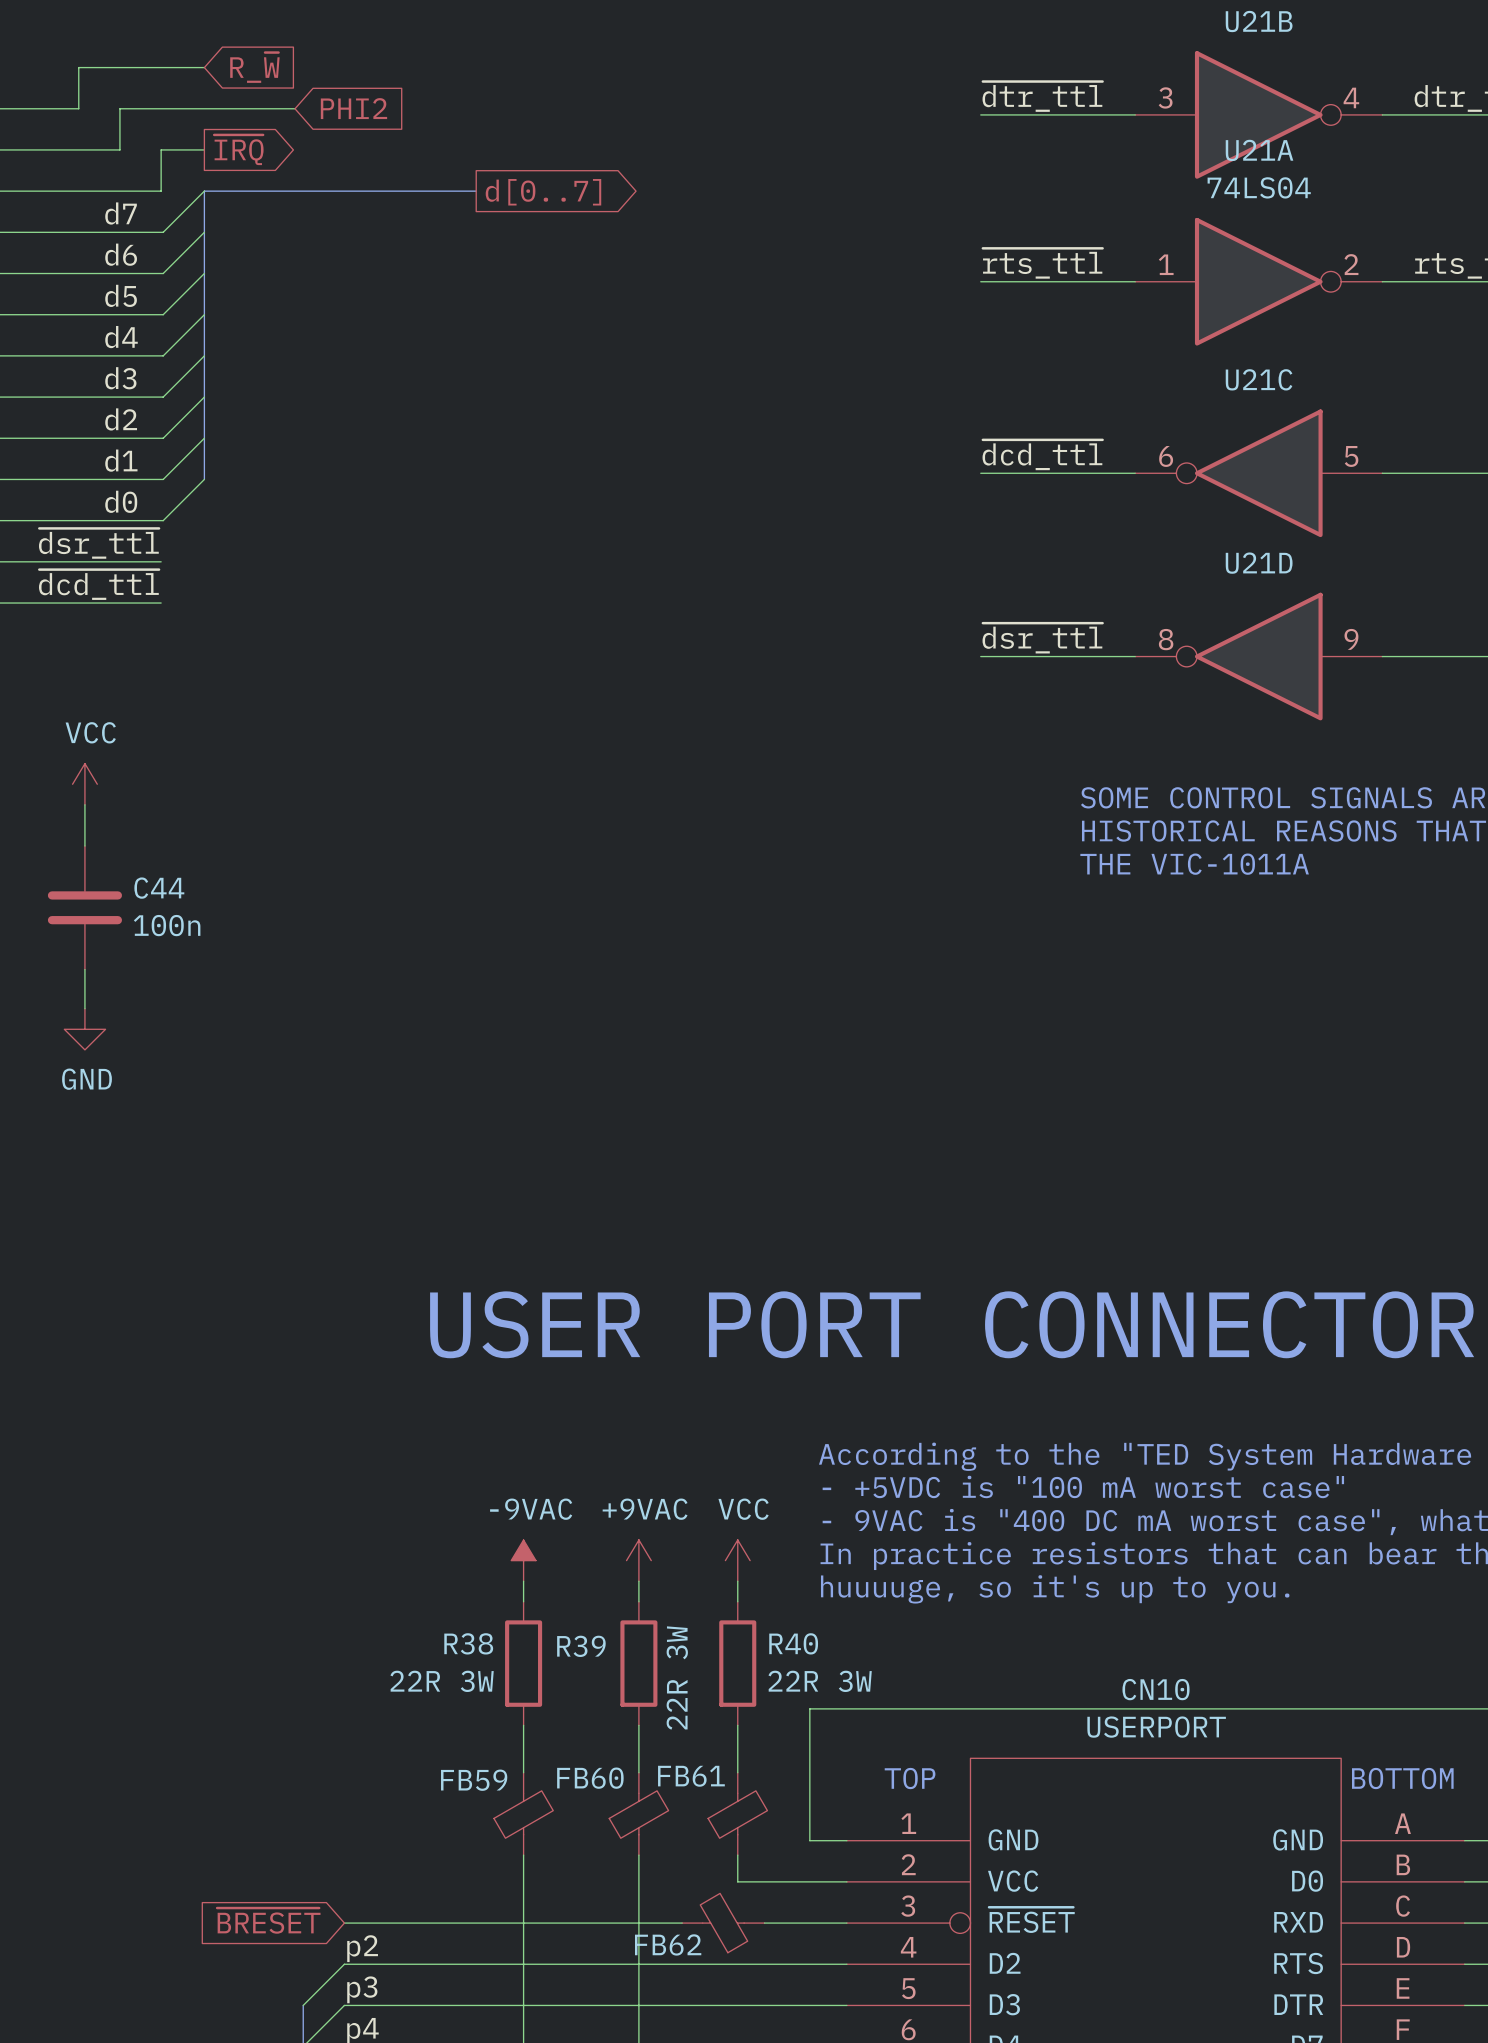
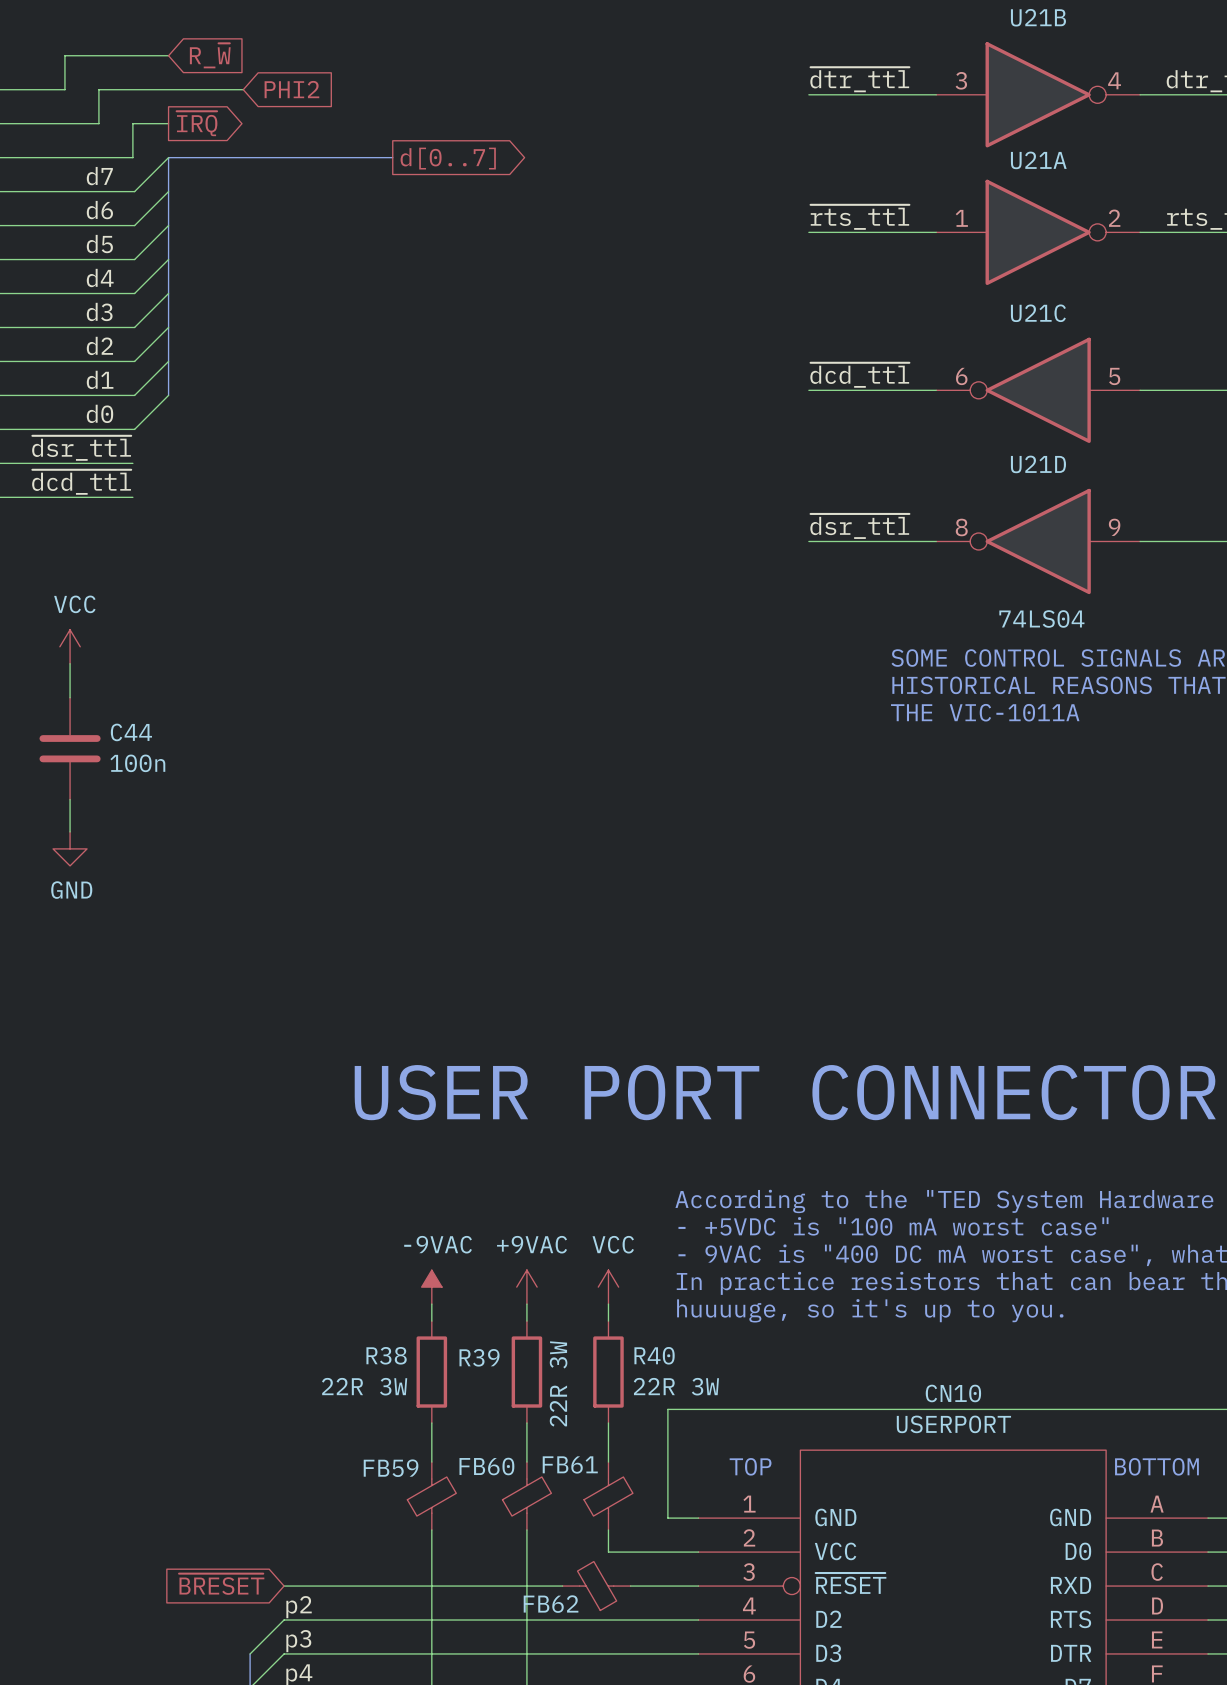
U21A name position: U21A (1259, 150) -> U21A (1038, 160)
U21A value position: 74LS04 (1259, 187) -> 74LS04 (1041, 618)

